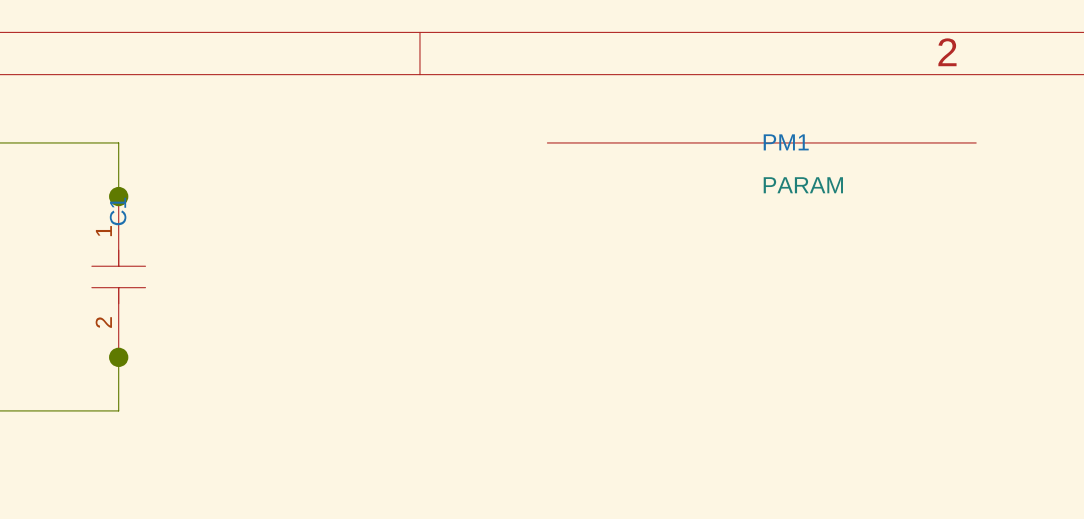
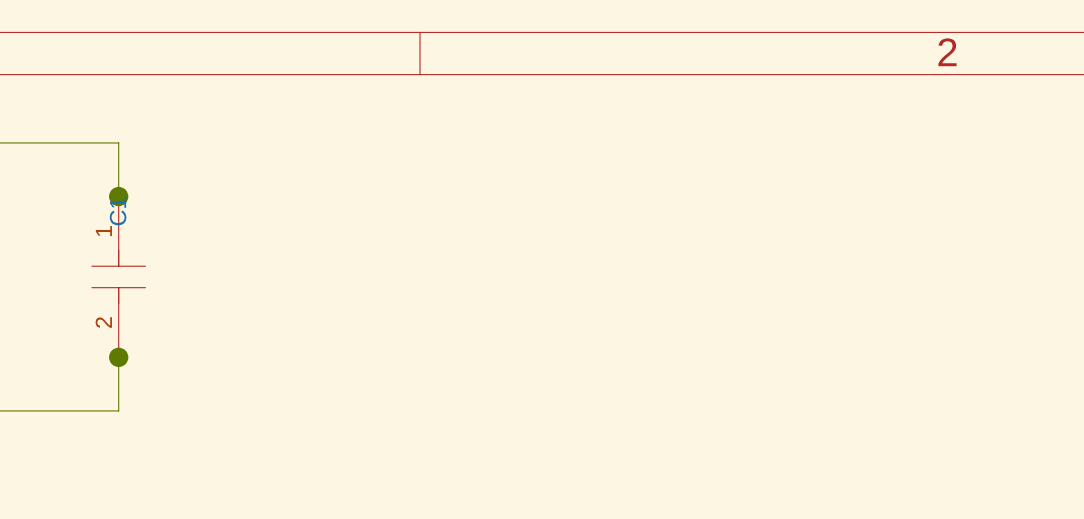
PM1: PARAM (761, 142) -> none

